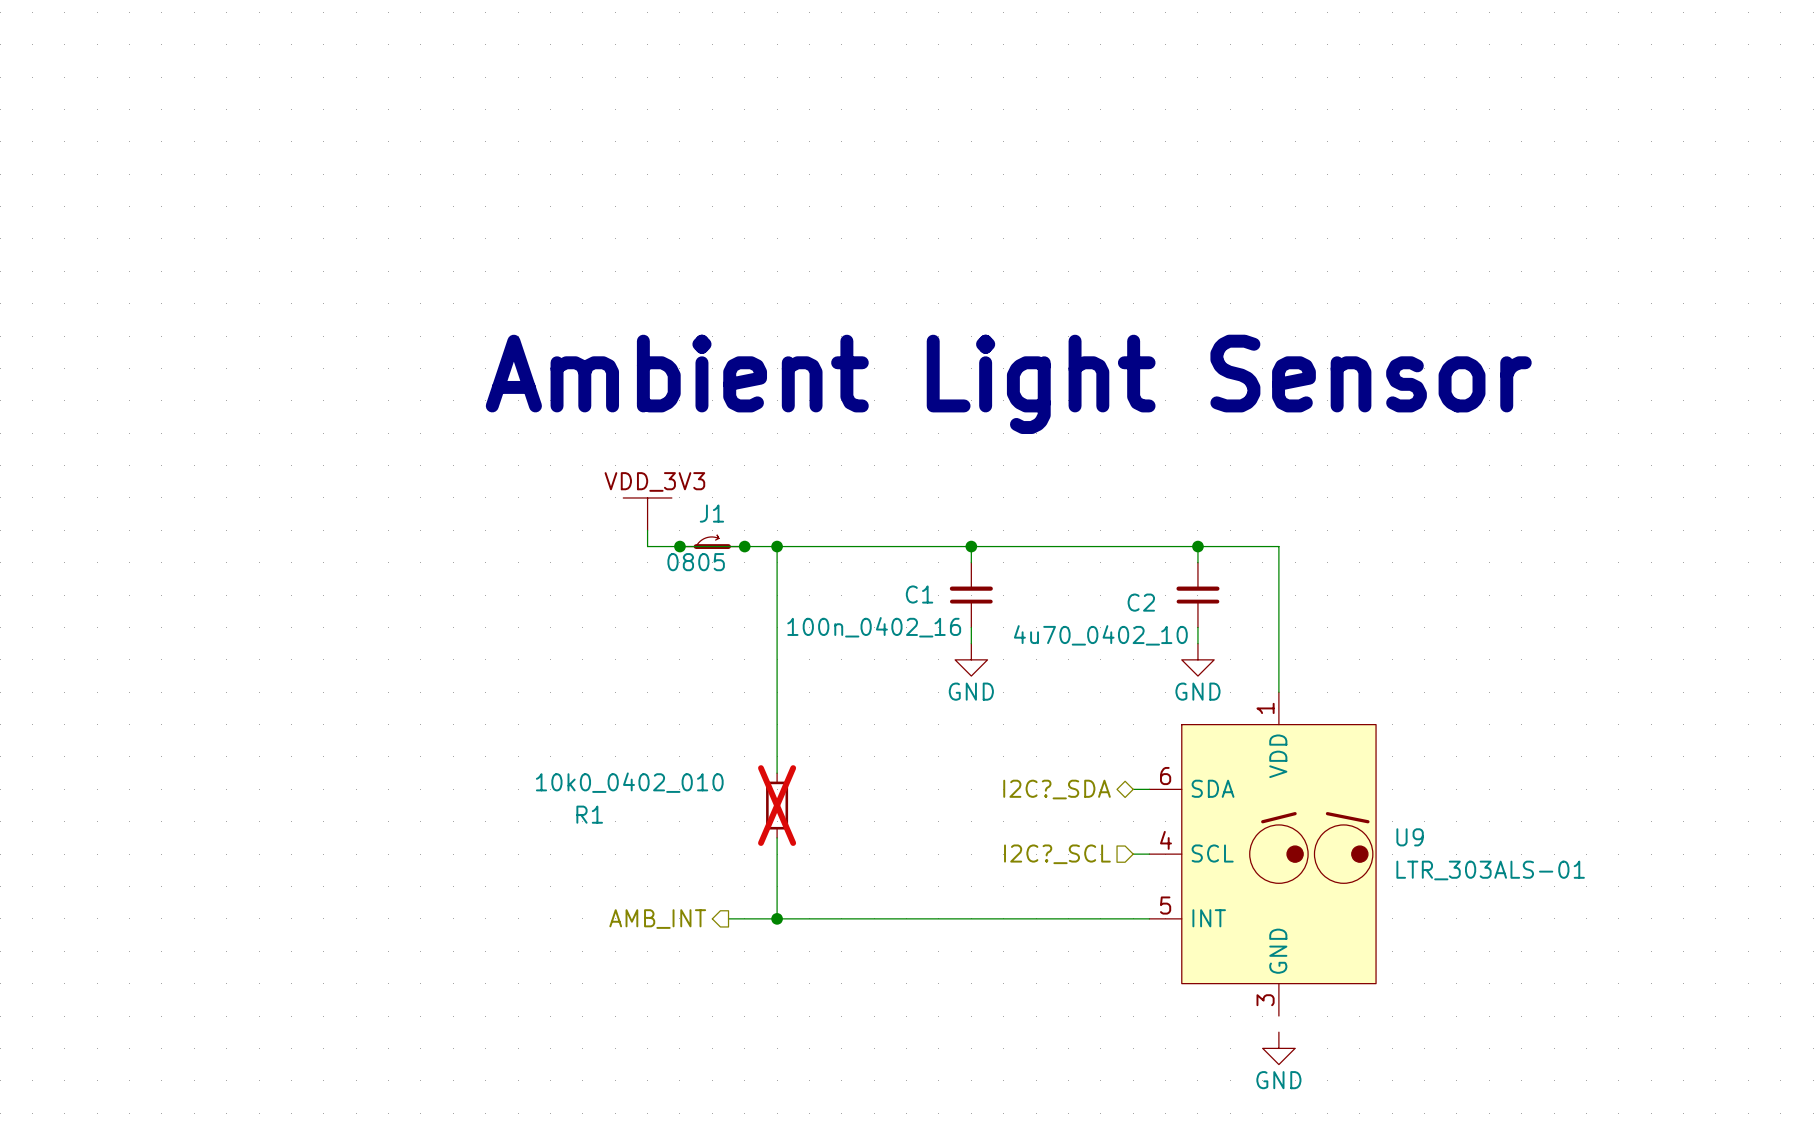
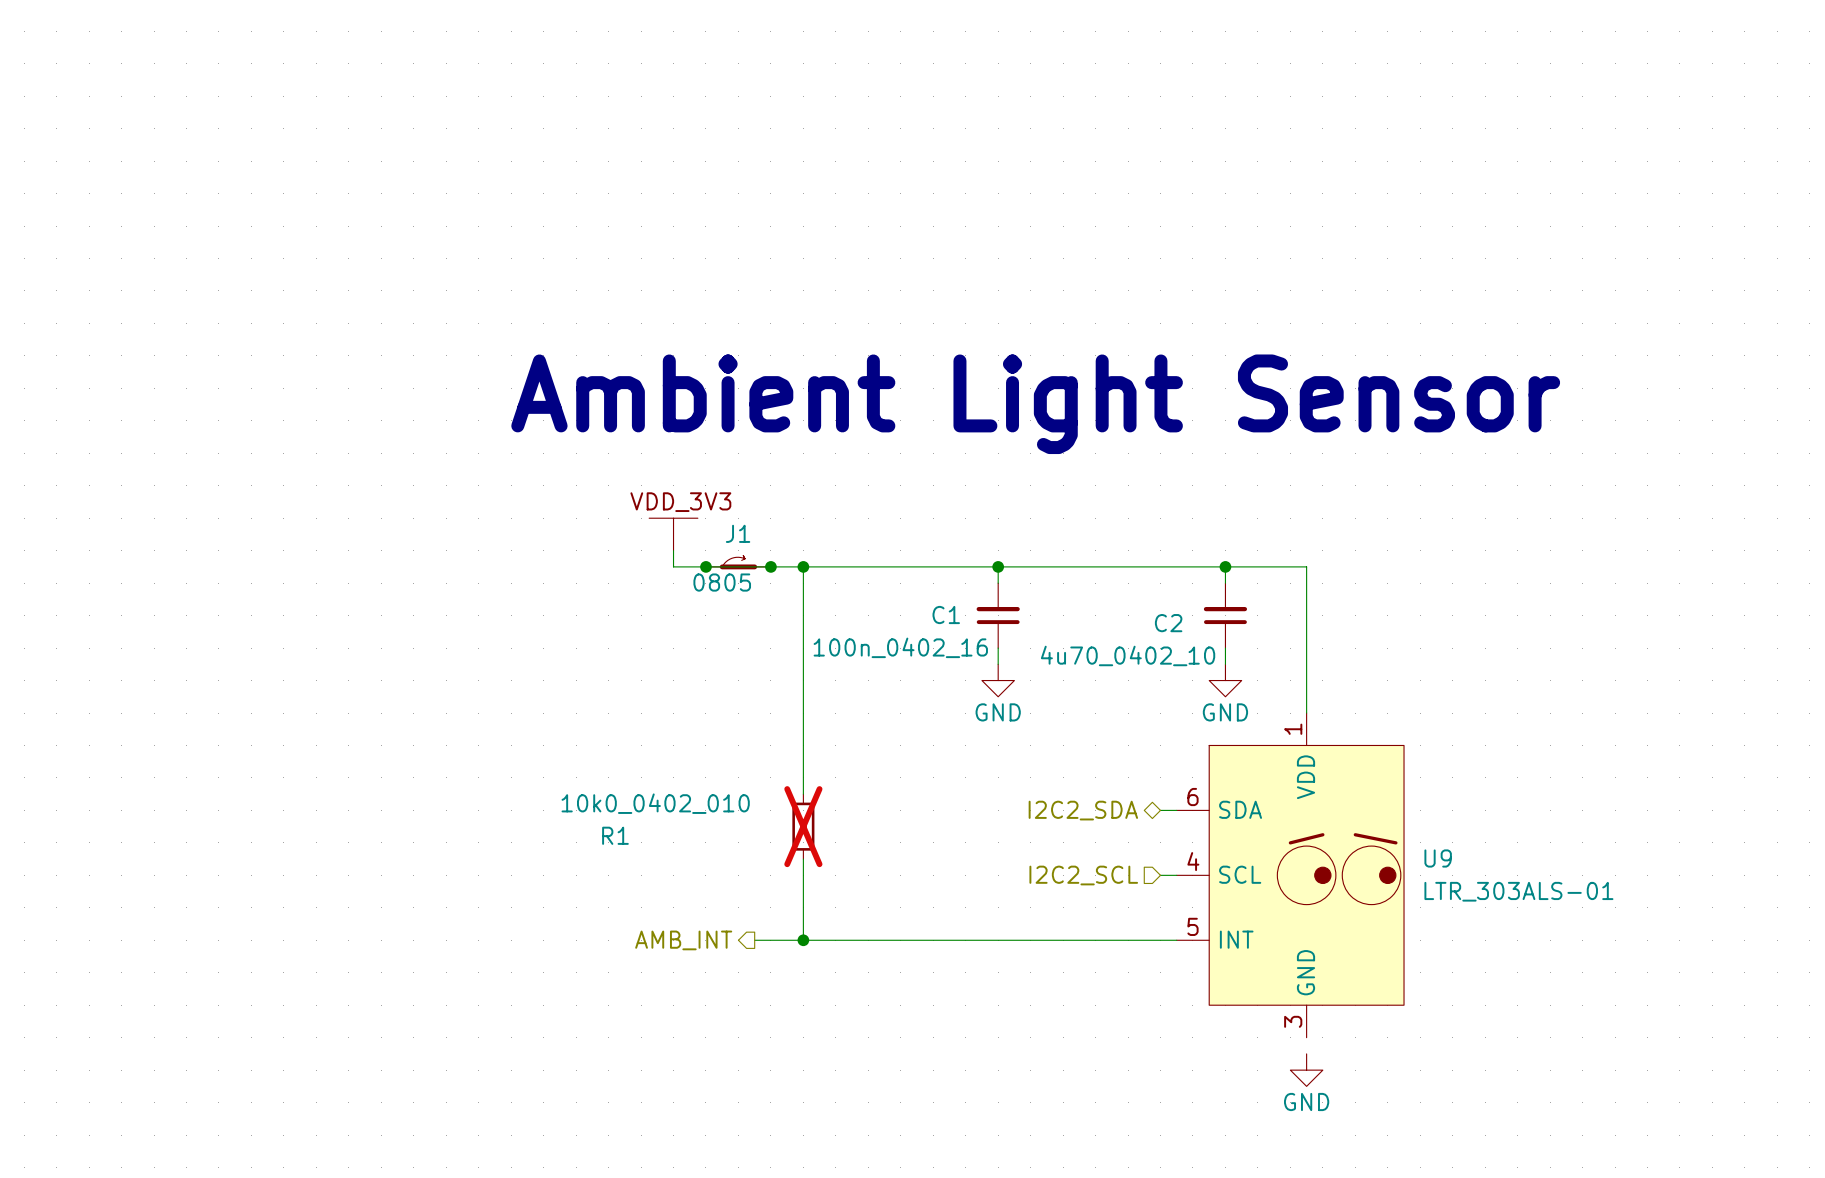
hierarchical label: I2C?_SDA (1057, 789) -> I2C2_SDA (1083, 810)
hierarchical label: I2C?_SCL (1057, 854) -> I2C2_SCL (1083, 875)

